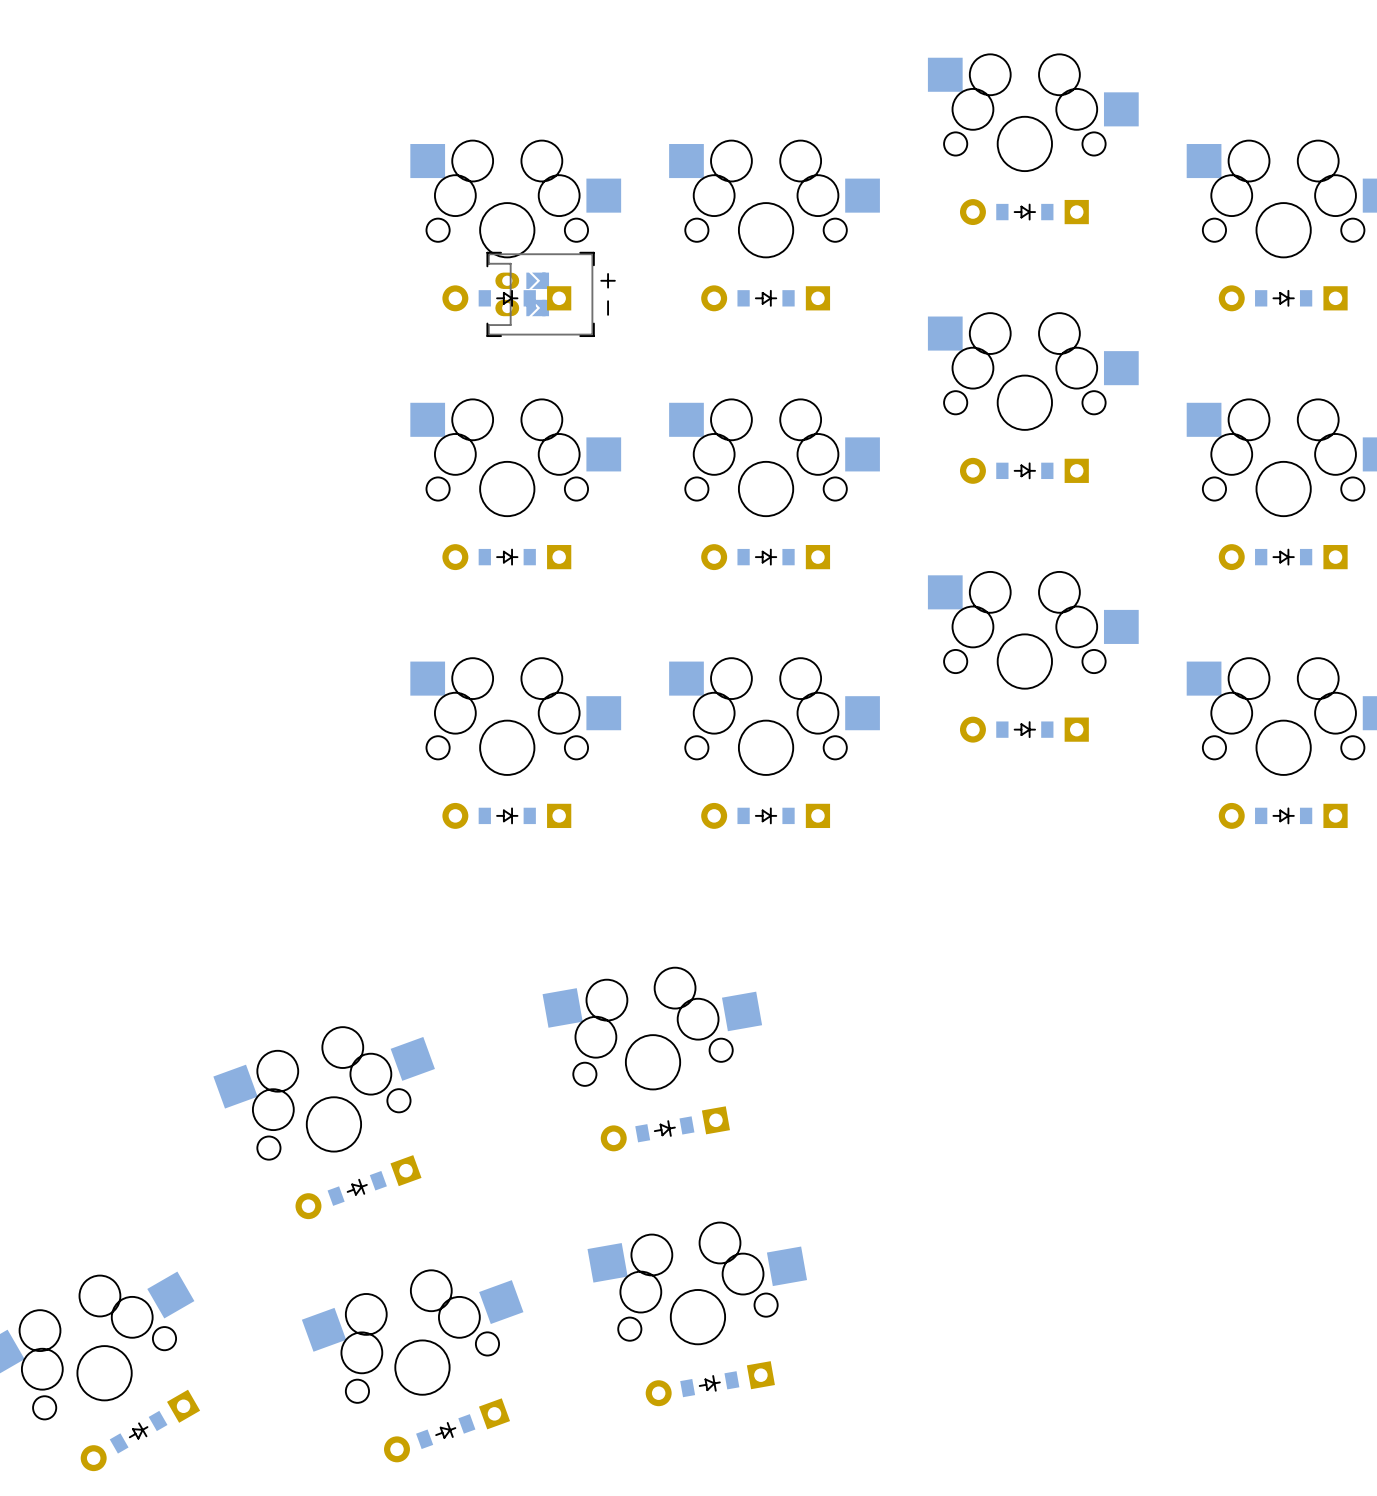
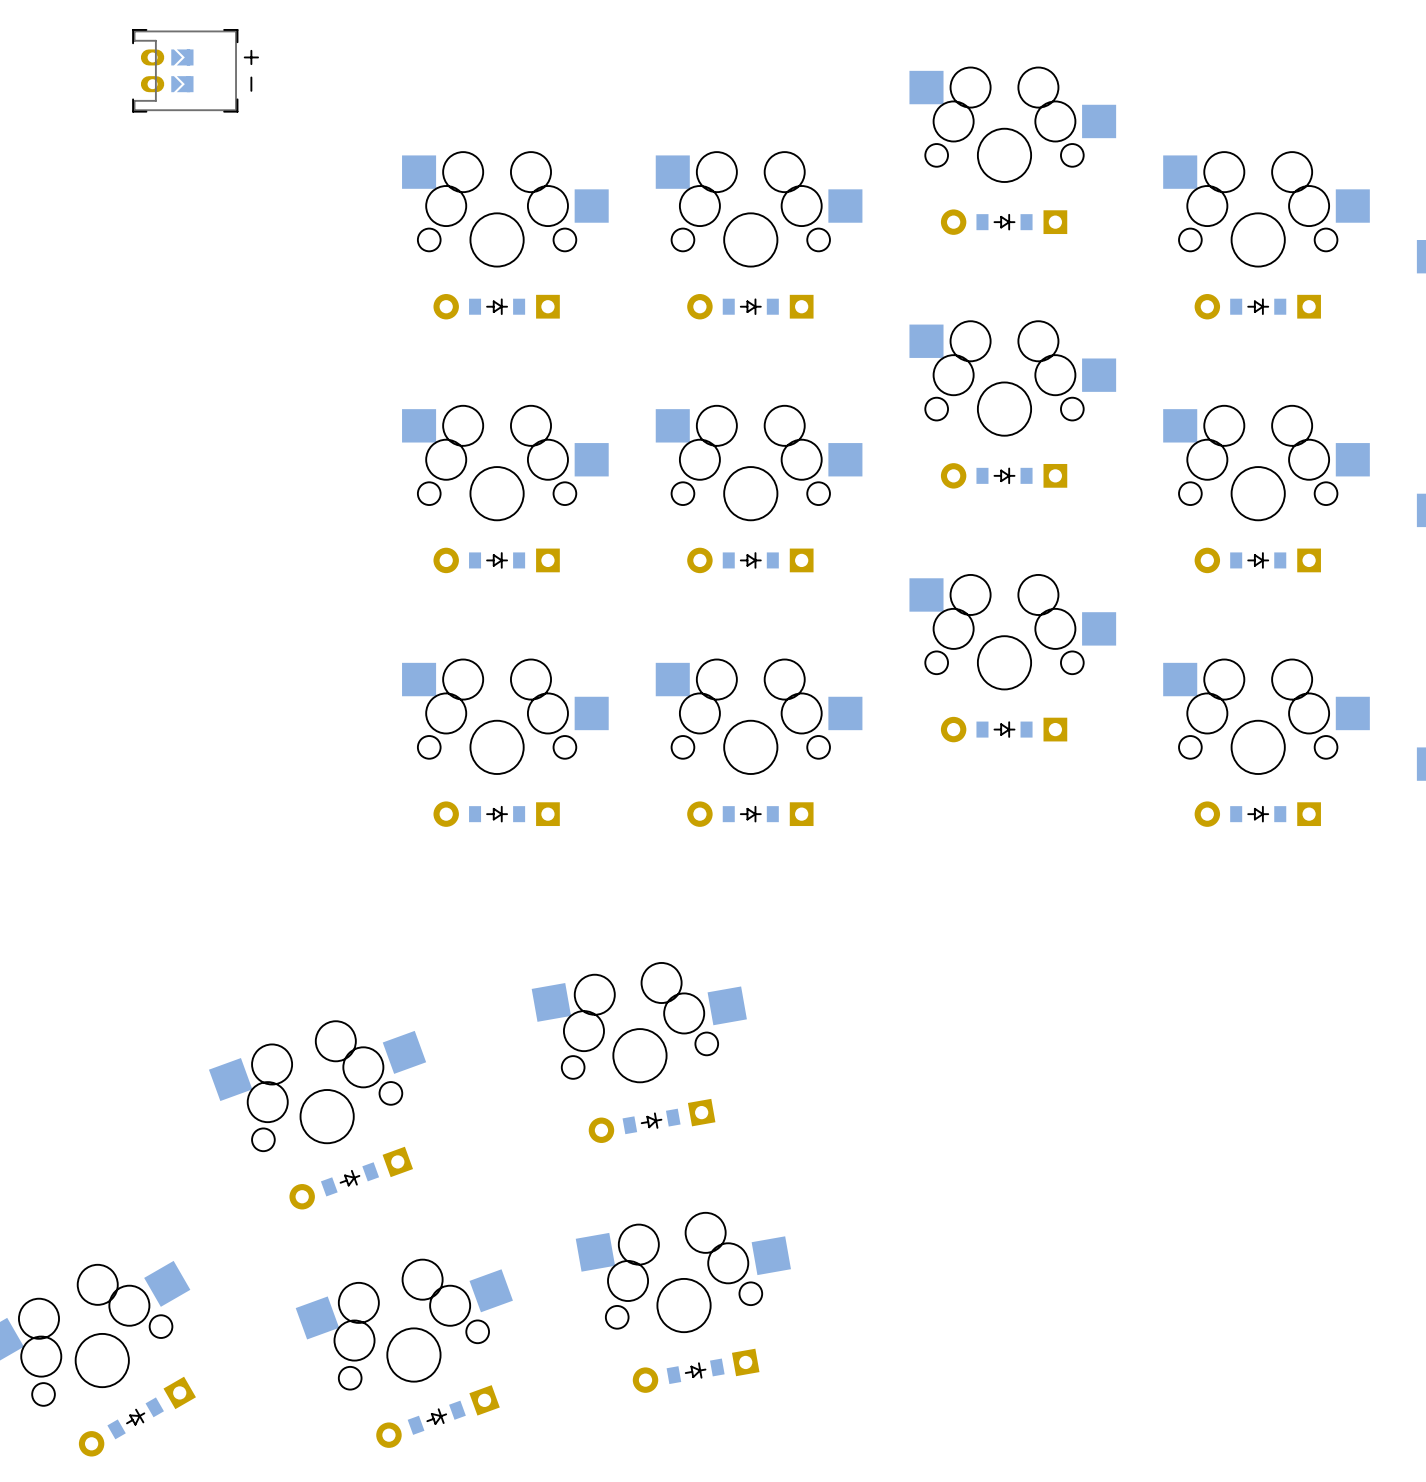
part: none -> (195, 70)
part: (551, 294) -> none

